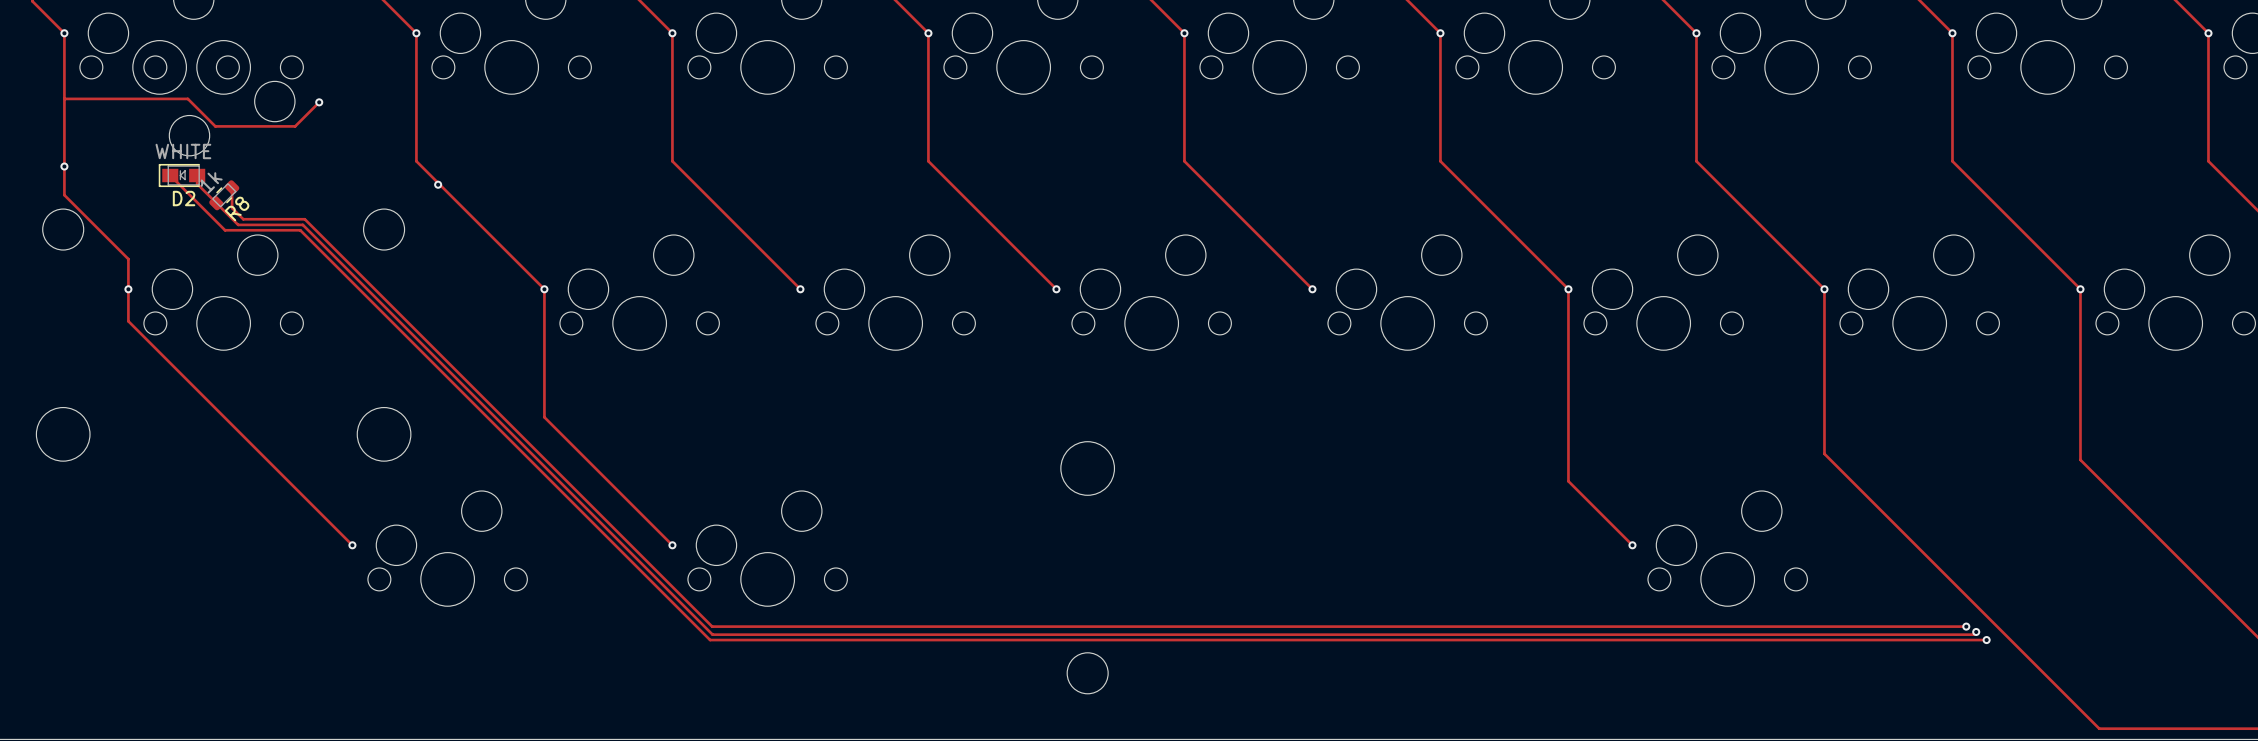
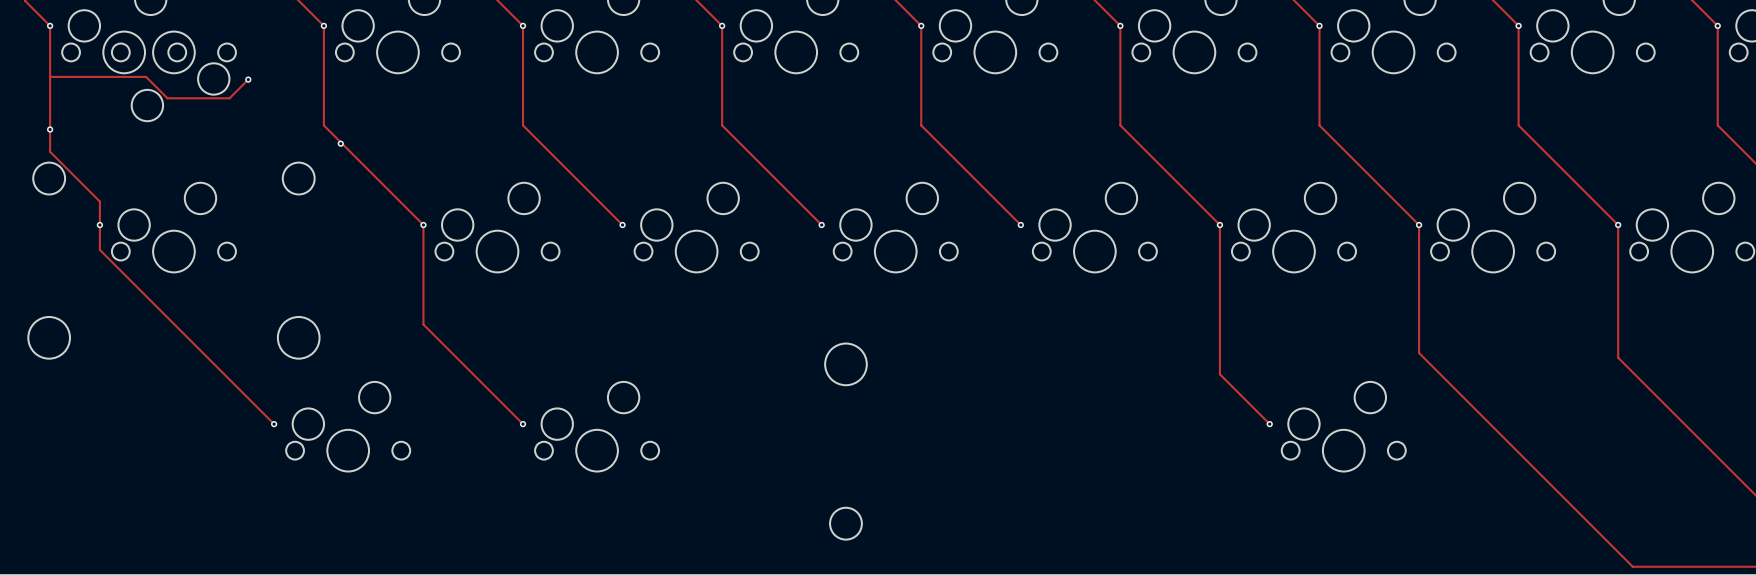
track: (170, 175) (225, 230) (300, 230) (710, 640) (1986, 640) -> none
D2: WHITE (181, 175) -> none
track: (197, 175) (197, 183) (238, 224) (302, 224) (712, 634) (1973, 634) (1976, 631) -> none
track: (232, 187) (232, 208) (243, 219) (304, 219) (712, 626) (1966, 626) -> none
R8: 1k (224, 195) -> none
via: (1966, 626) -> none
via: (1976, 631) -> none
via: (1986, 640) -> none

